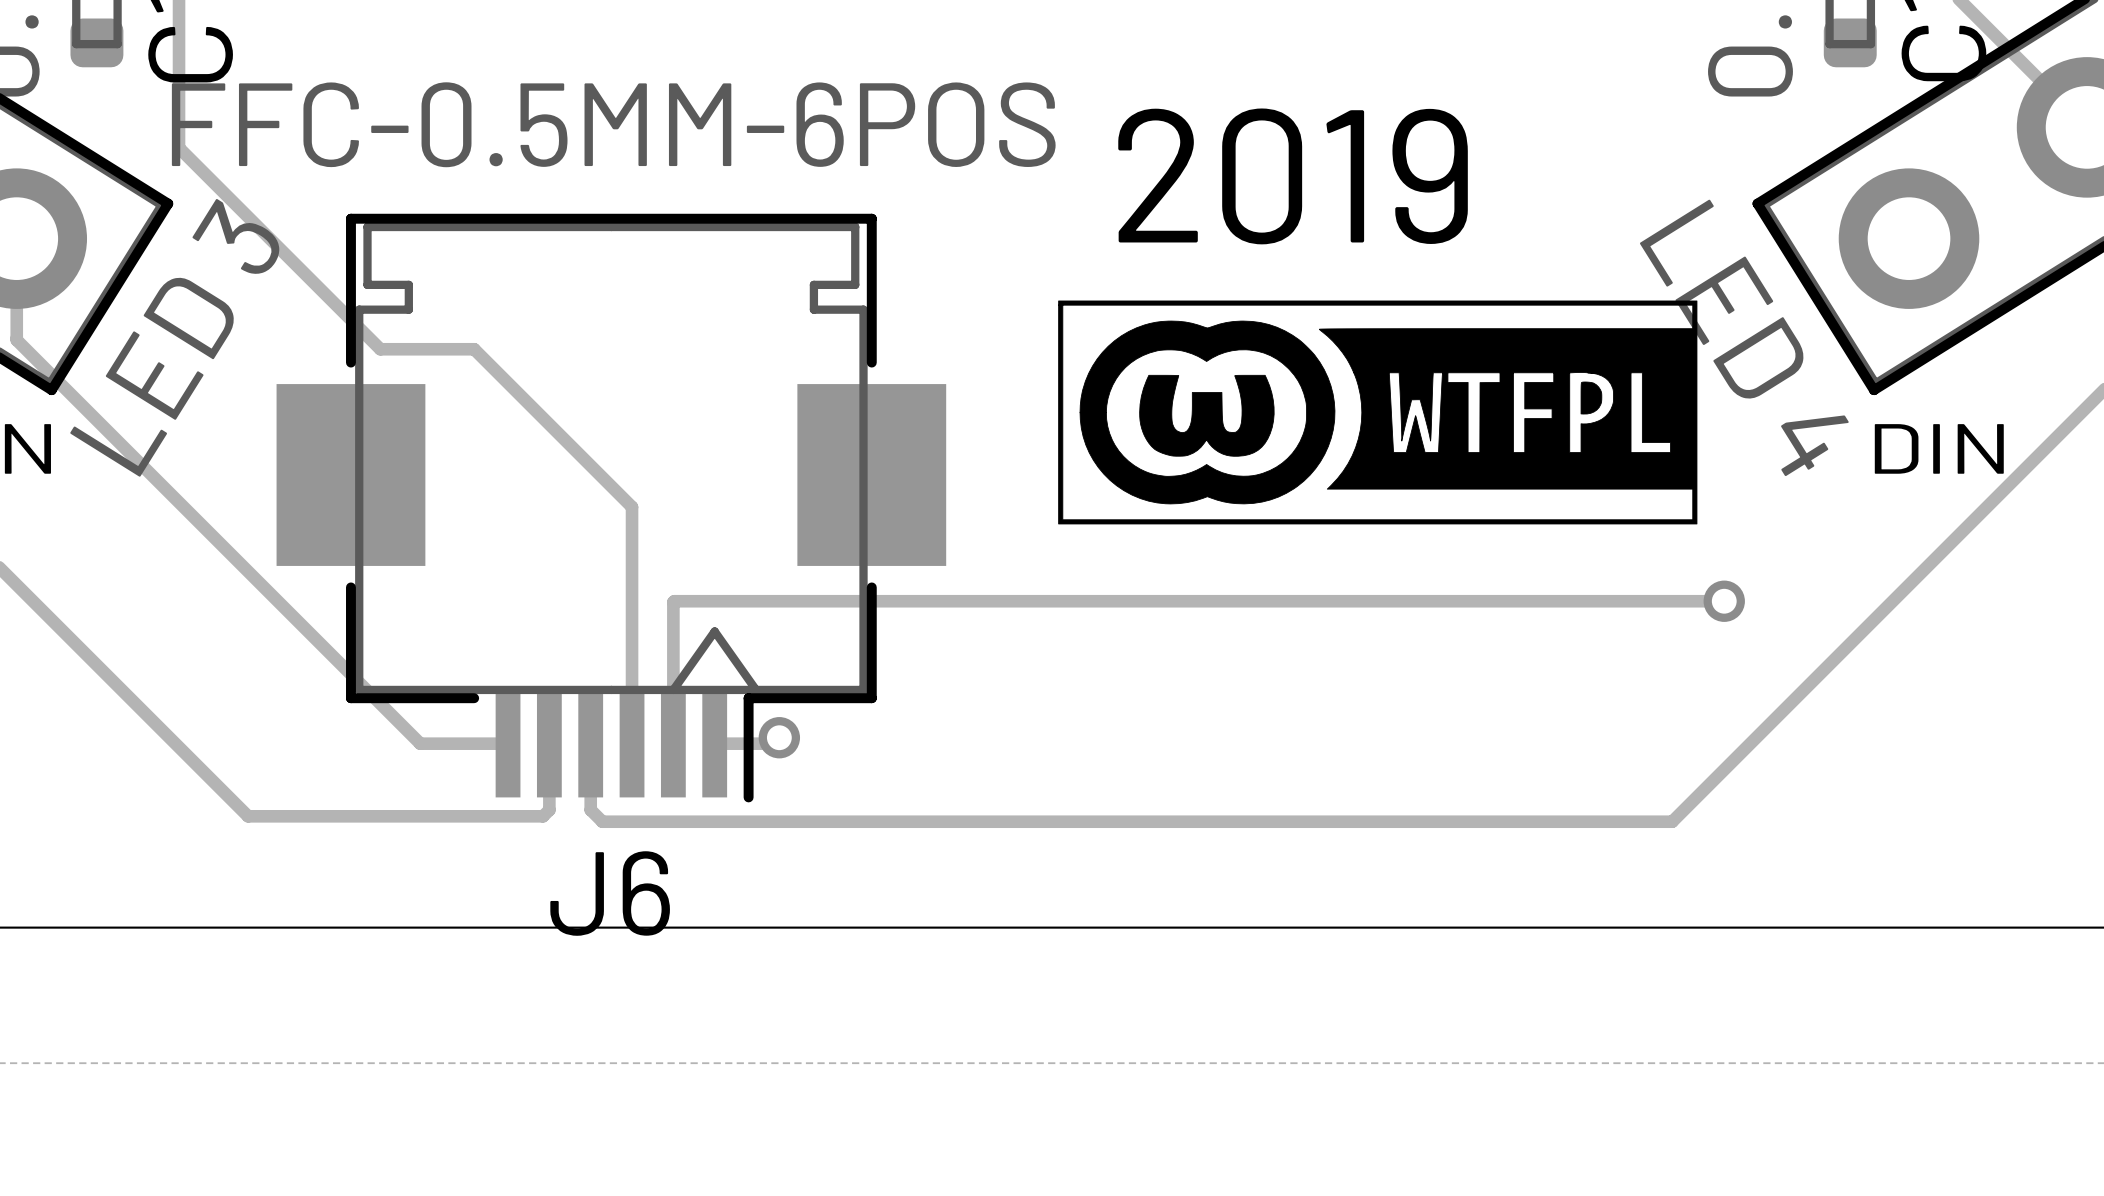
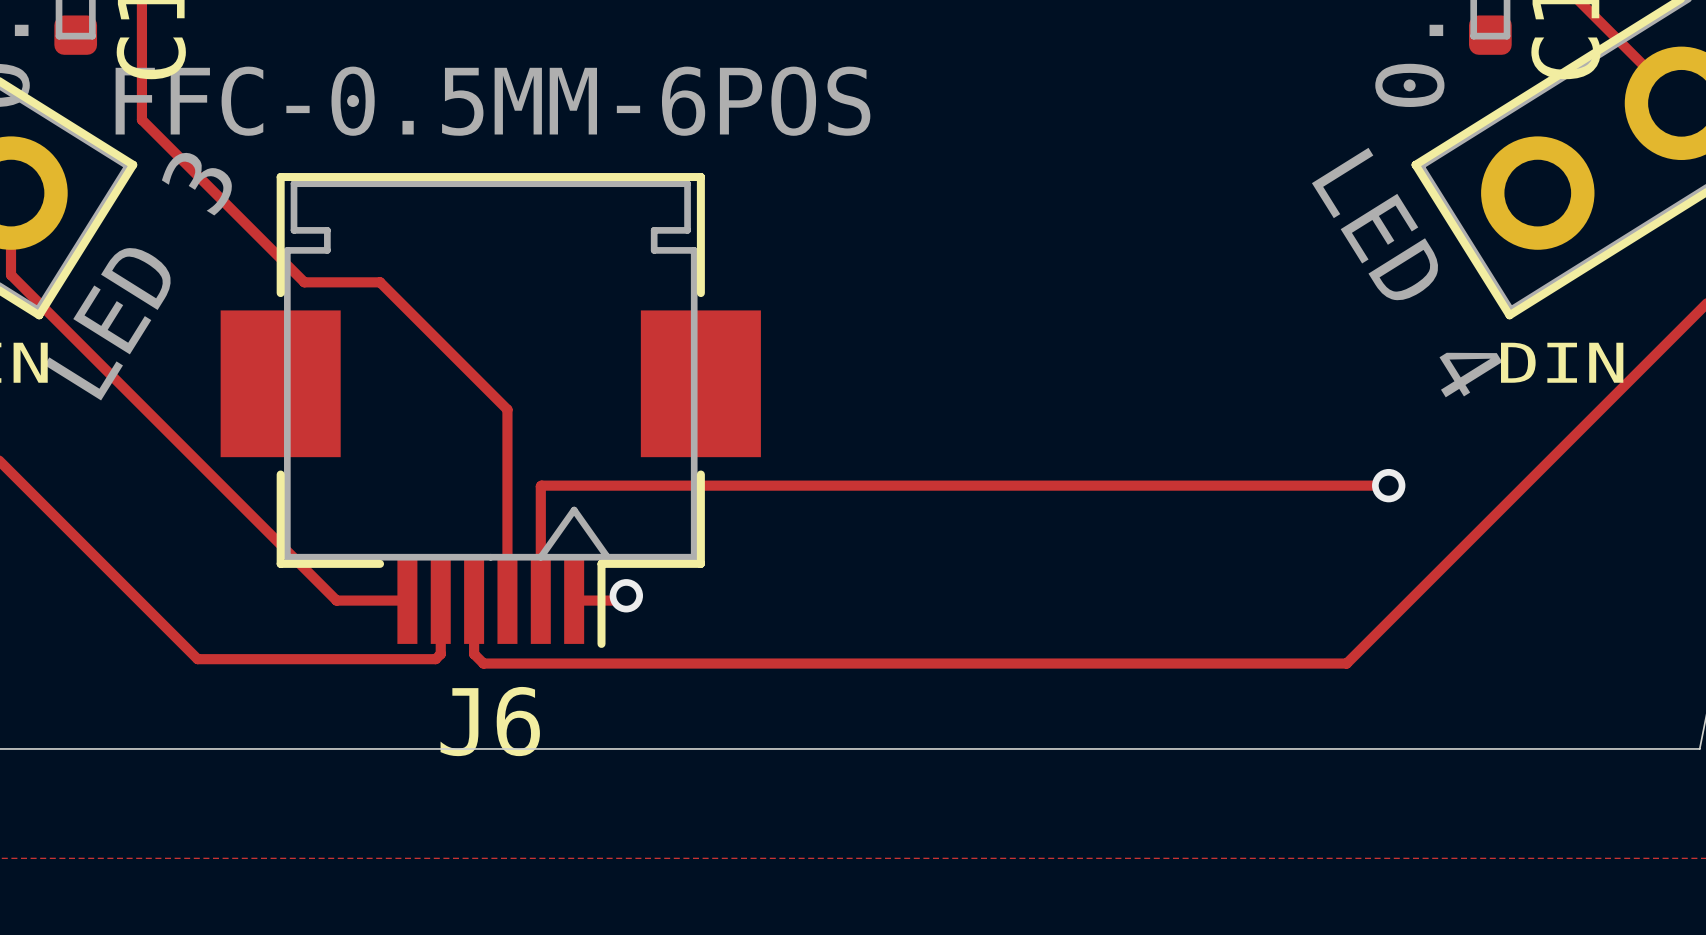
text: 2019 (1293, 176) -> none
drawing: [1058, 300, 1698, 525] -> none

